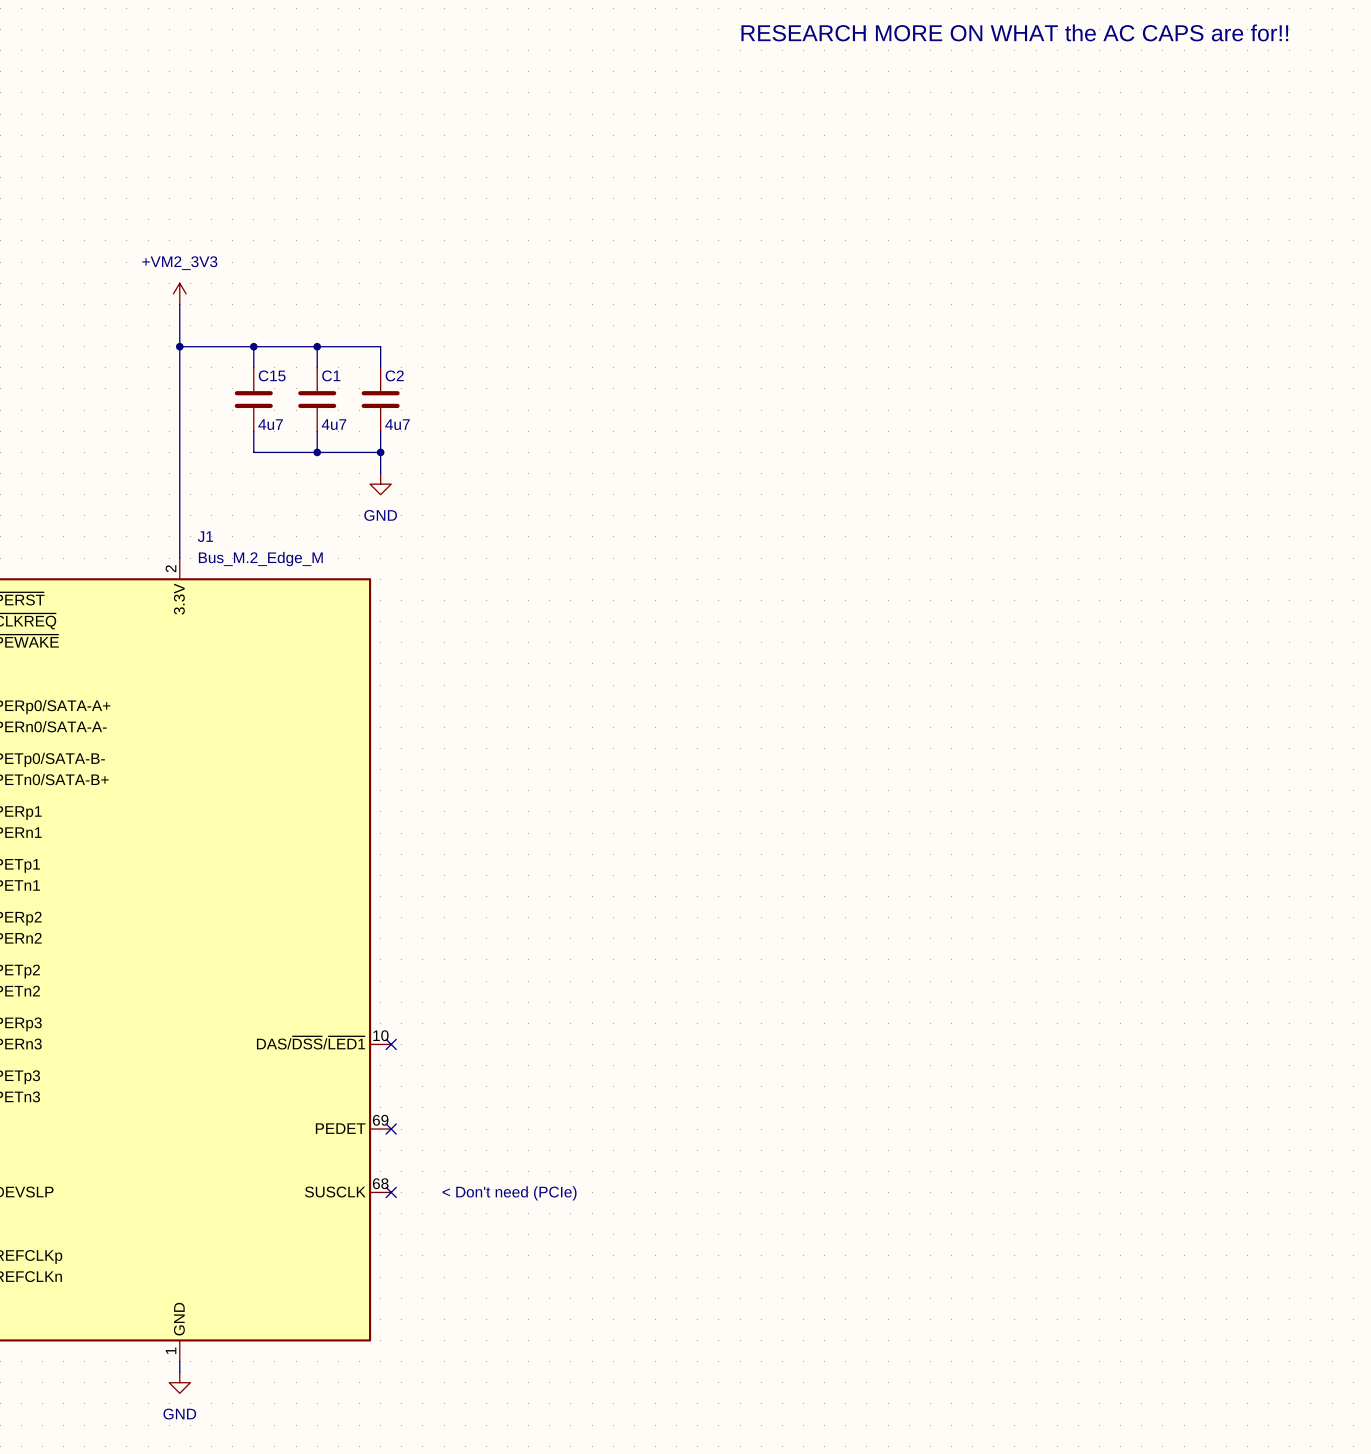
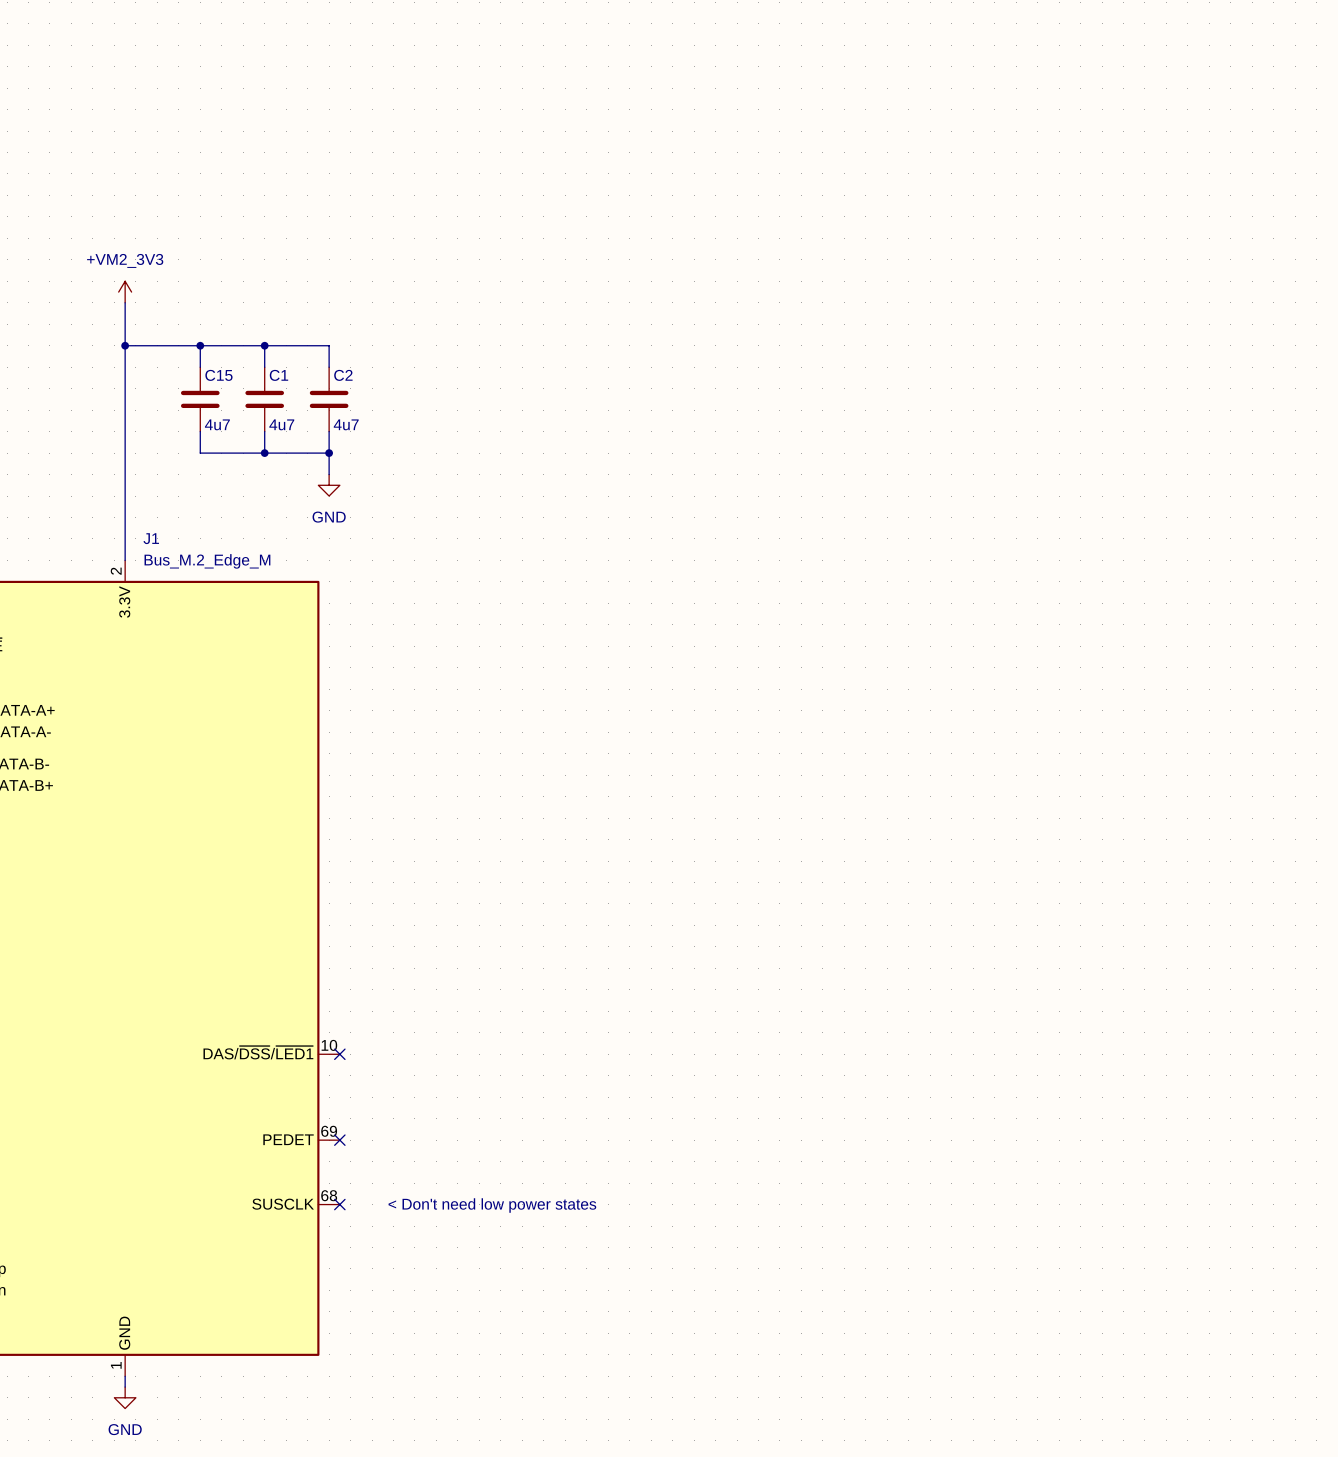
text: RESEARCH MORE ON WHAT the AC CAPS are for!! (1014, 32) -> none
text: < Don't need (PCIe) (509, 1193) -> none
text: none -> < Don't need low power states (492, 1205)

